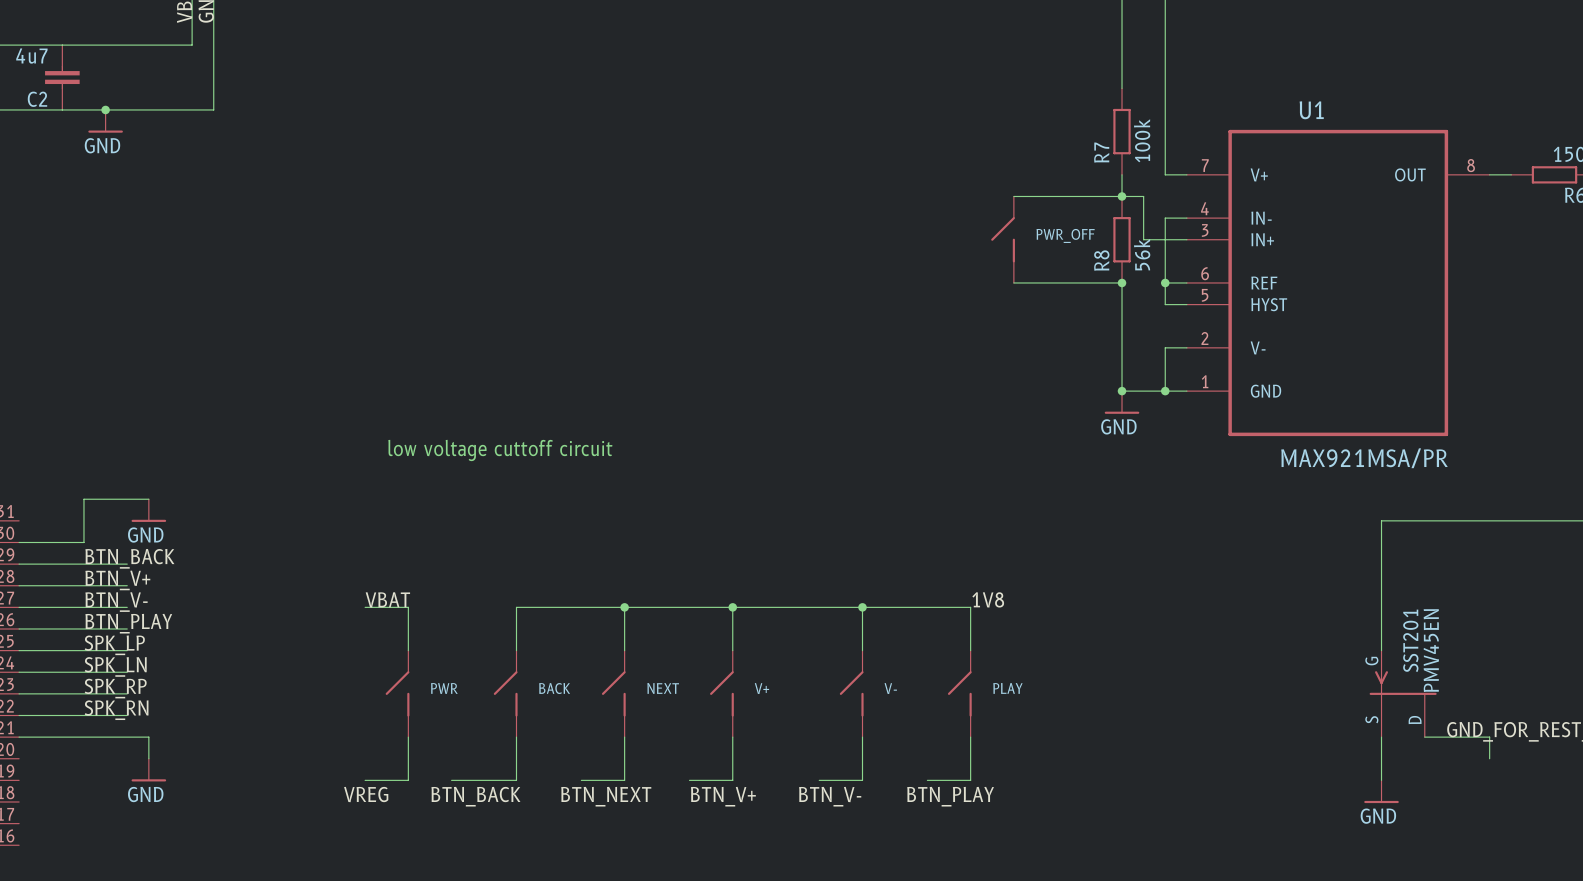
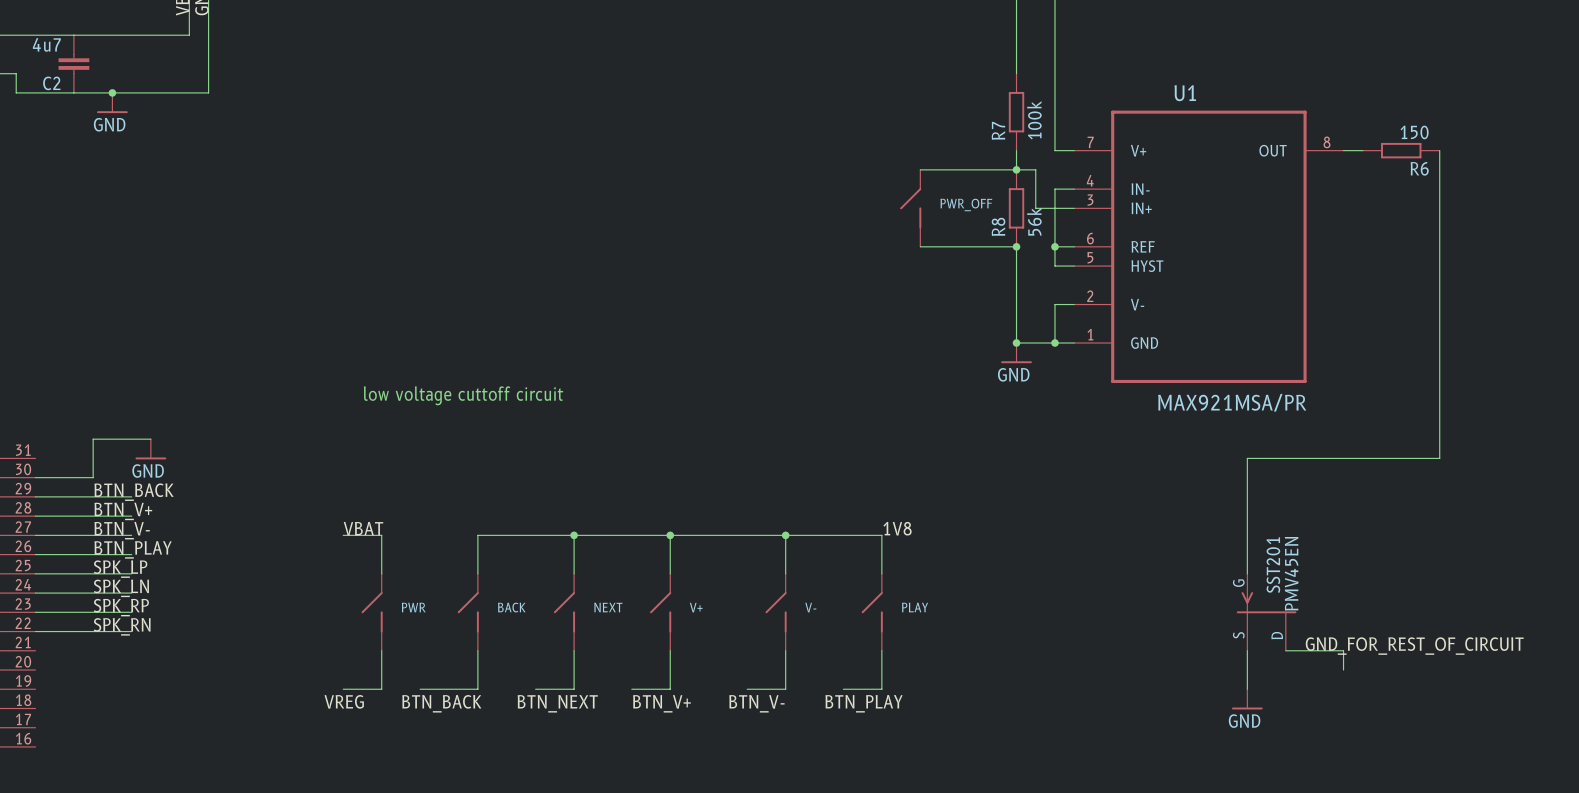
wire: (19, 737) (148, 737) (148, 758) -> none
power symbol: GND (148, 770) -> none

